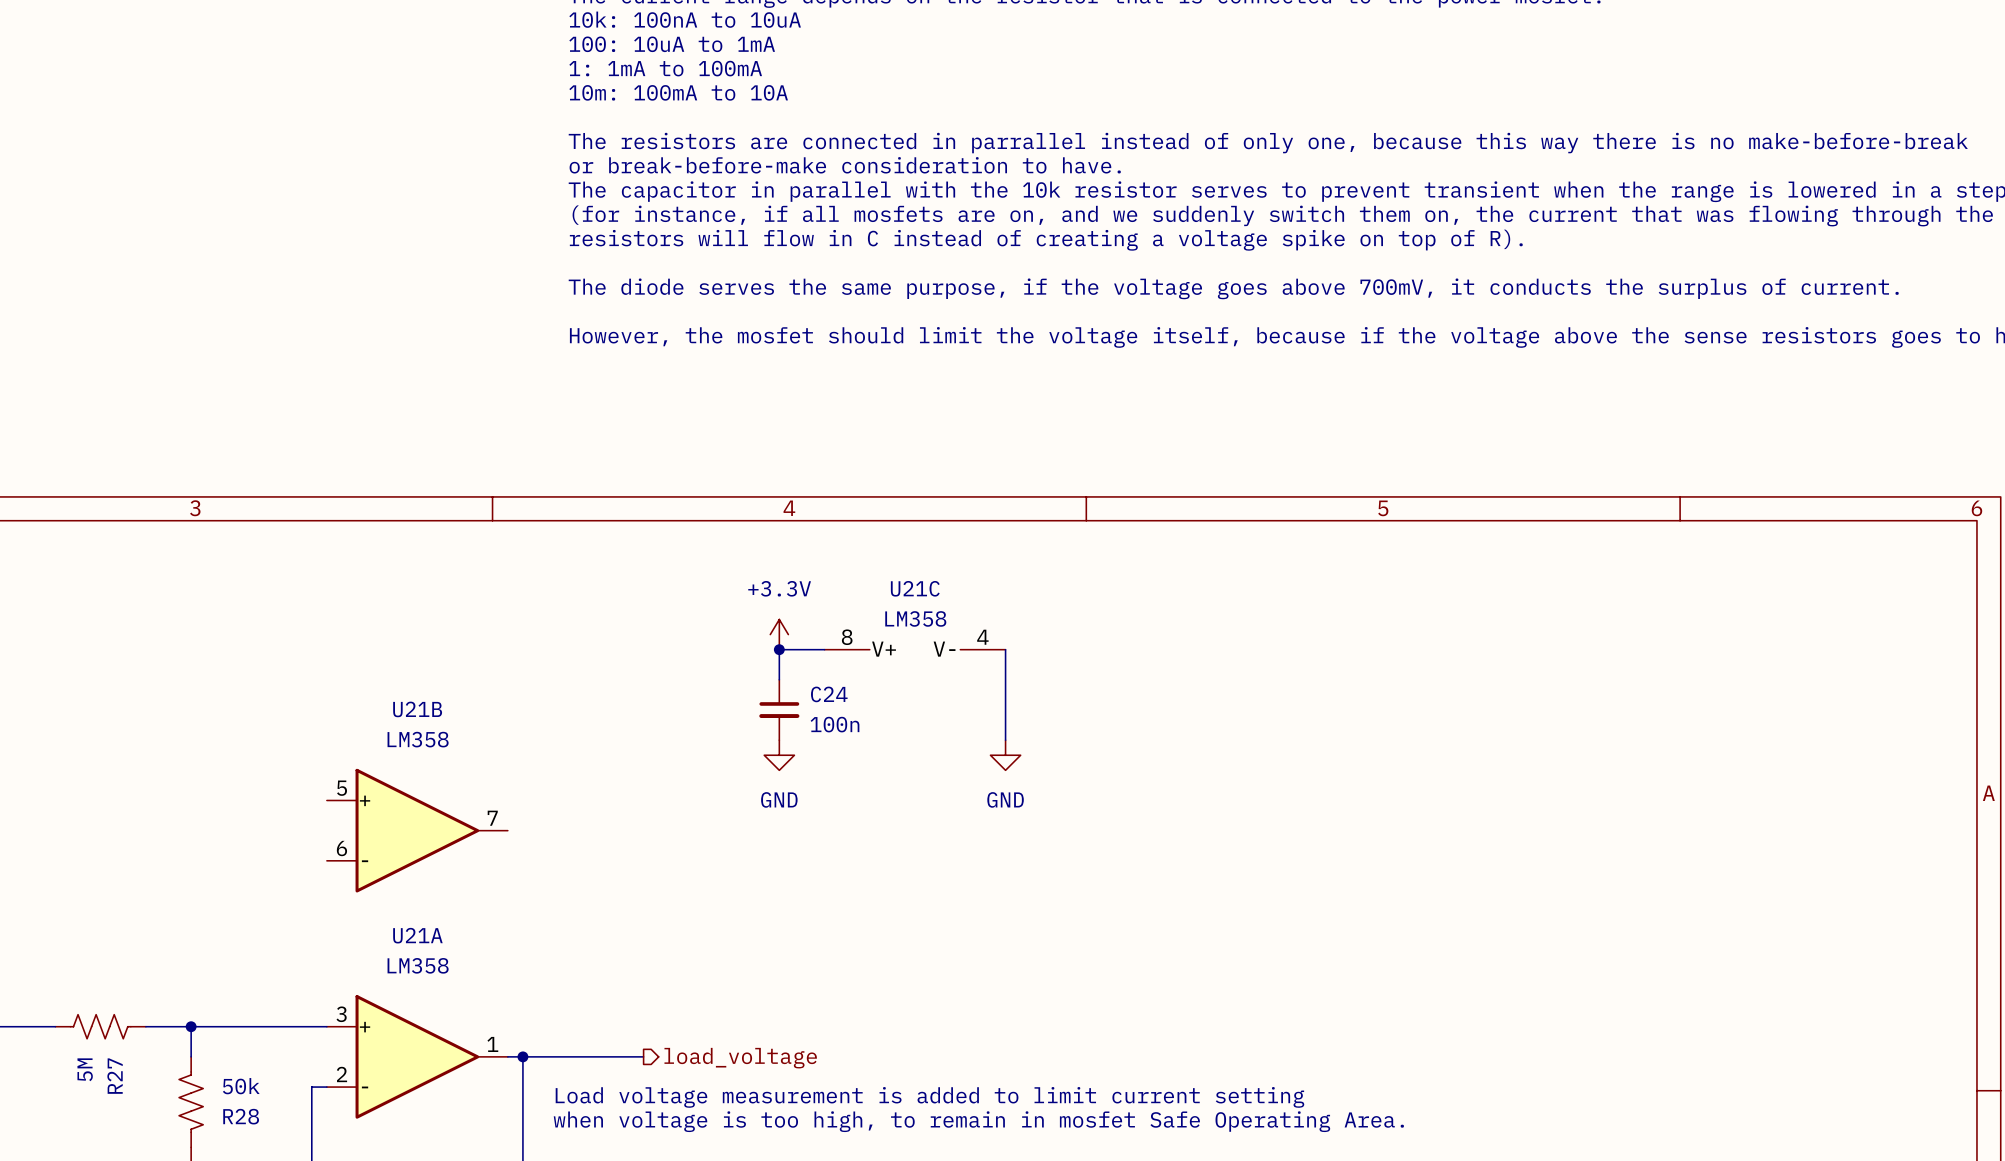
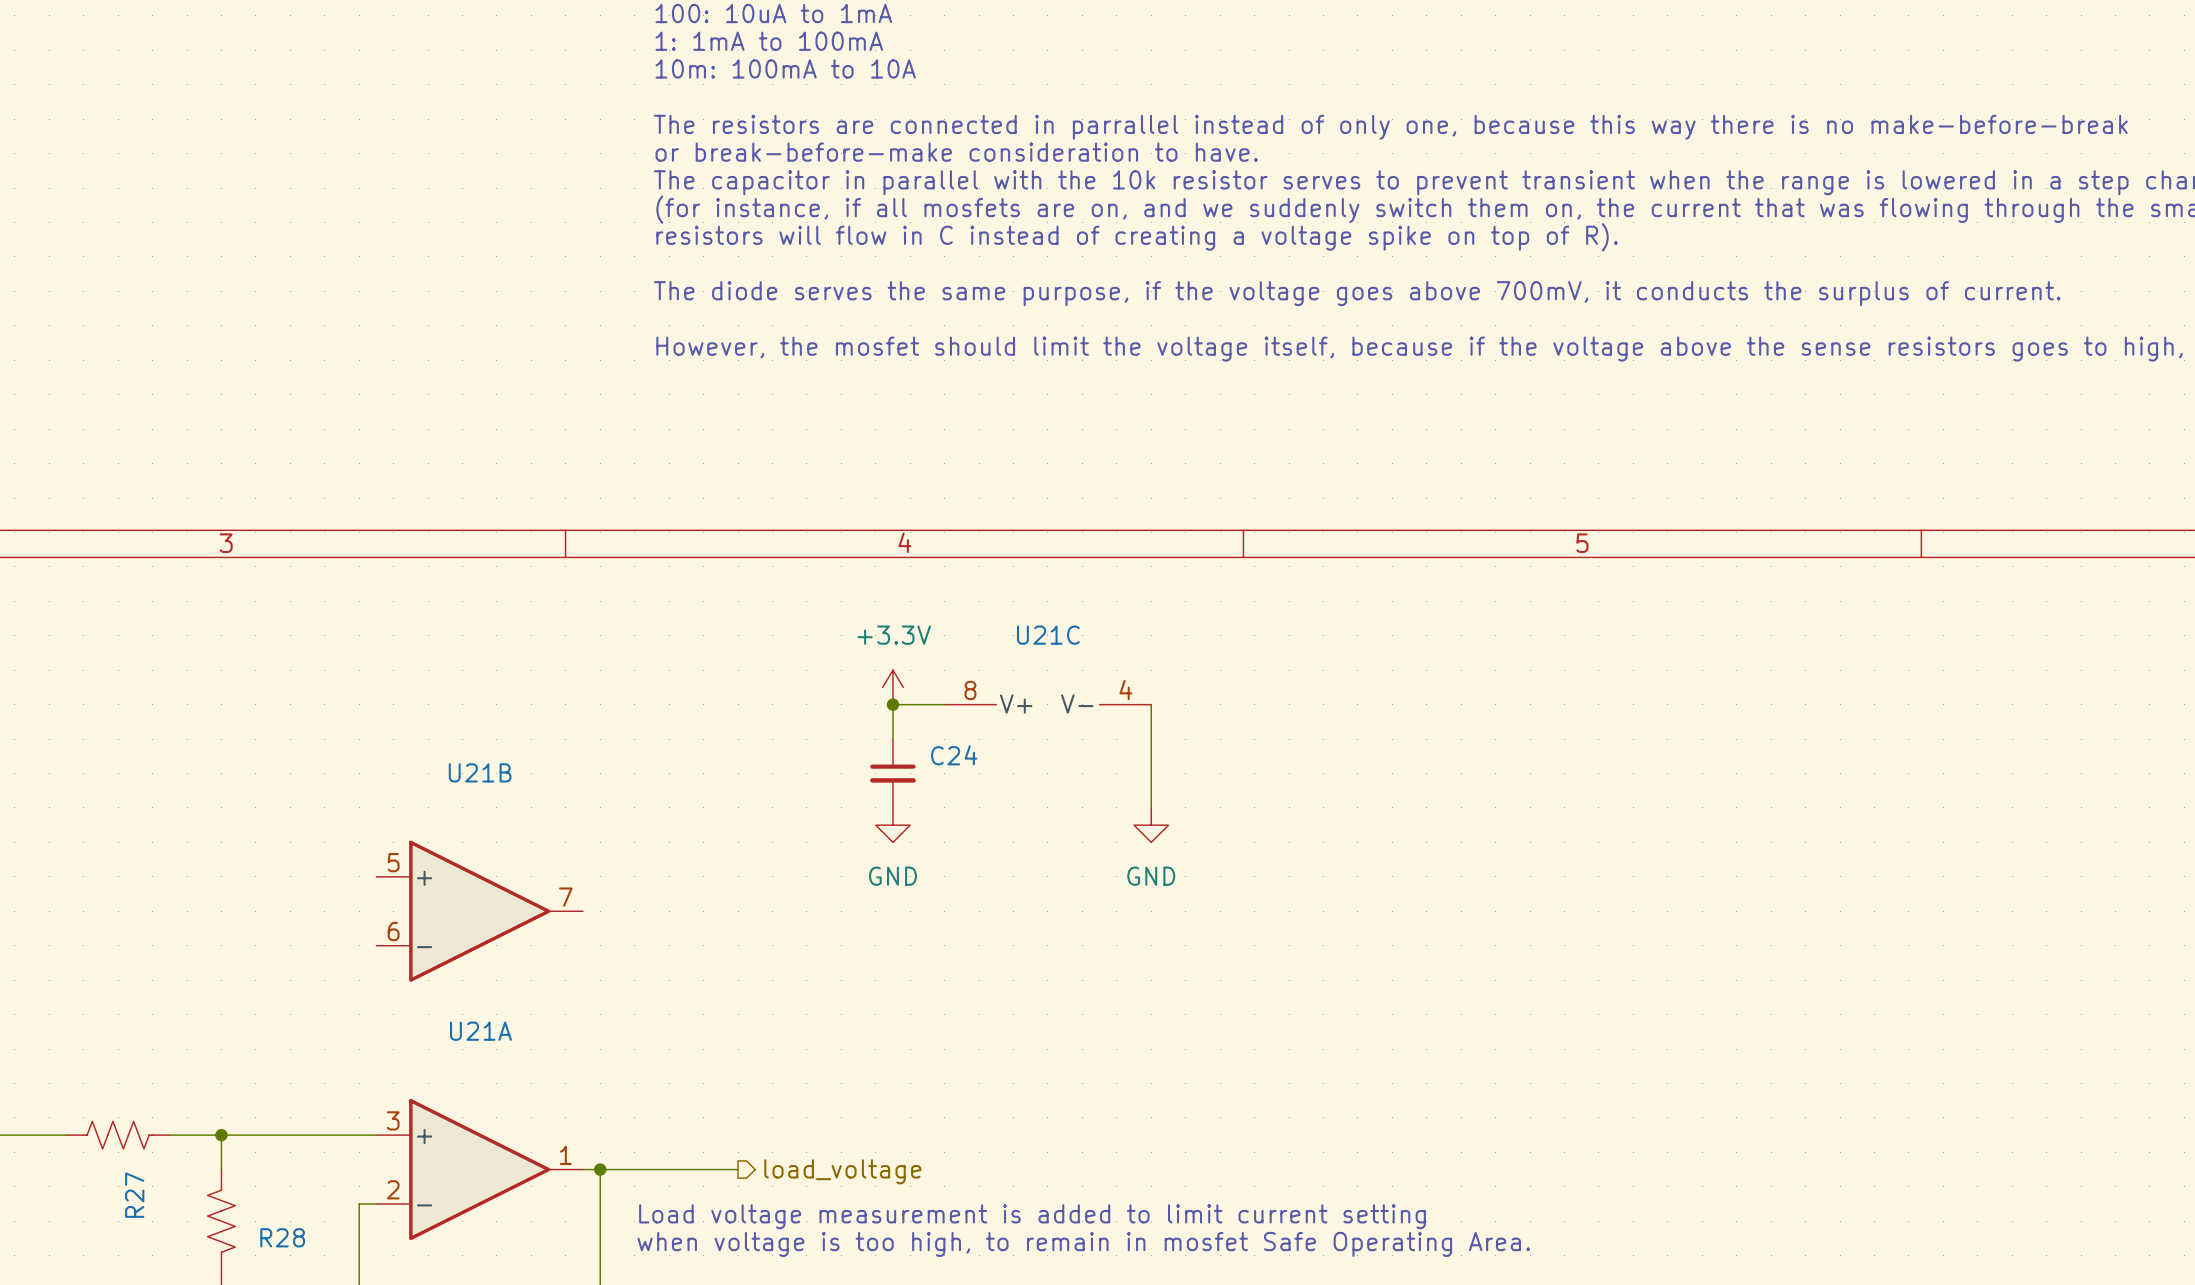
U21C value: LM358 (915, 618) -> none
C24 value: 100n (835, 724) -> none
U21B value: LM358 (418, 739) -> none
U21A value: LM358 (418, 965) -> none
R27 value: 5M (85, 1069) -> none
R28 value: 50k (241, 1086) -> none

